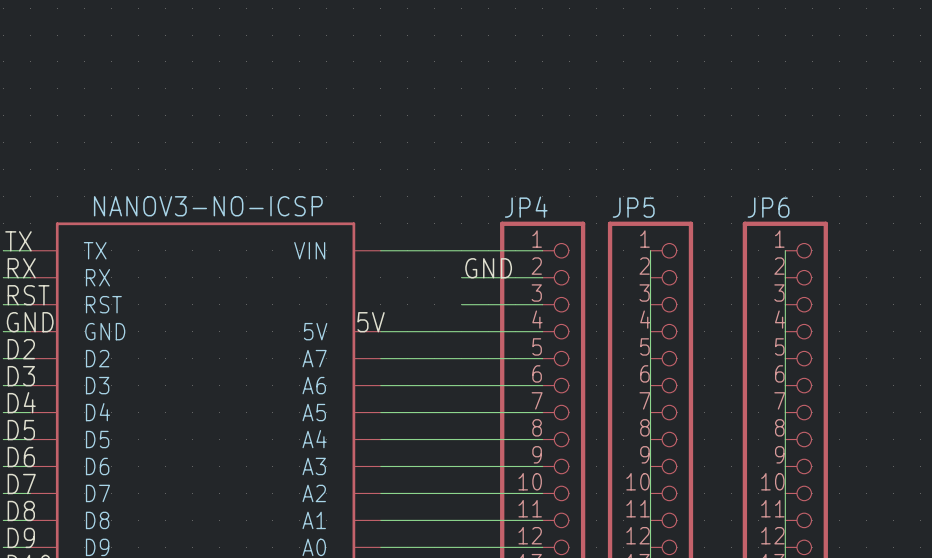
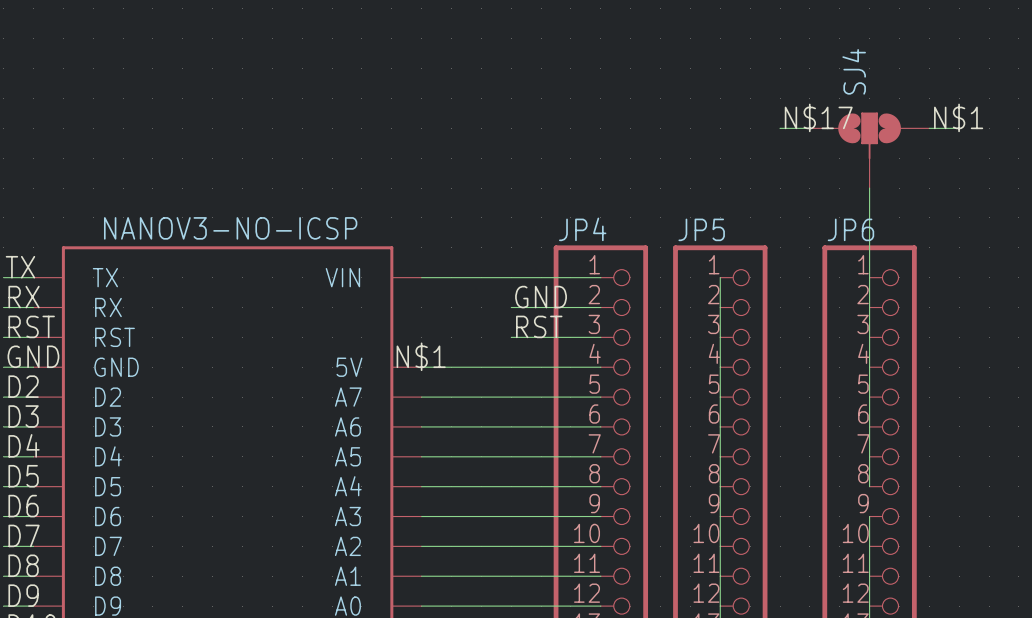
label: none -> N$17 (818, 117)
label: none -> N$1 (958, 117)
wire: none -> (780, 128) (809, 128)
wire: none -> (929, 128) (959, 128)
SJ4: none -> (869, 150)
wire: none -> (869, 188) (869, 277)
label: none -> RST (539, 326)
label: 5V (371, 322) -> N$1 (421, 356)
wire: (785, 439) (785, 466) -> none

